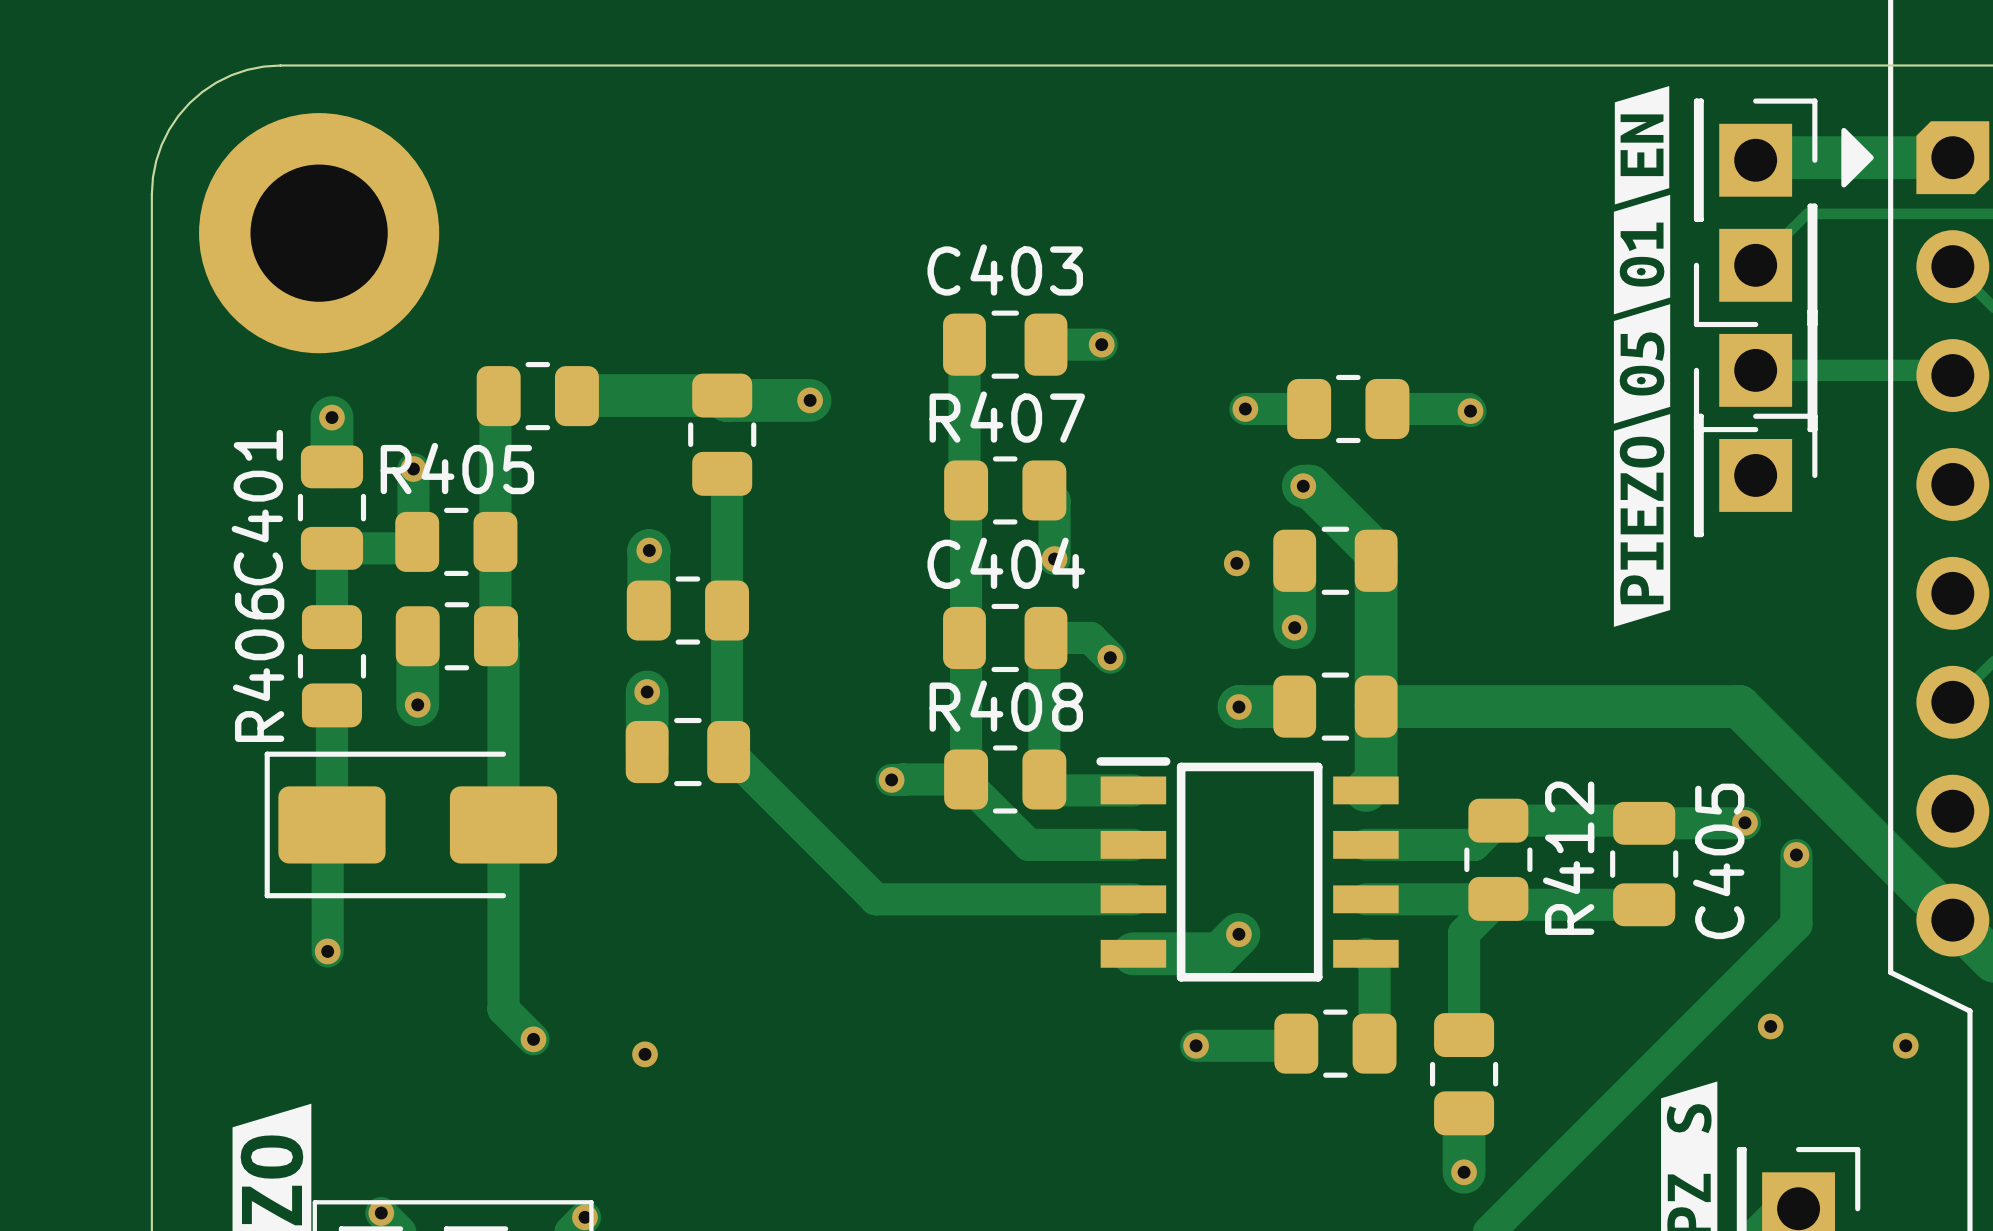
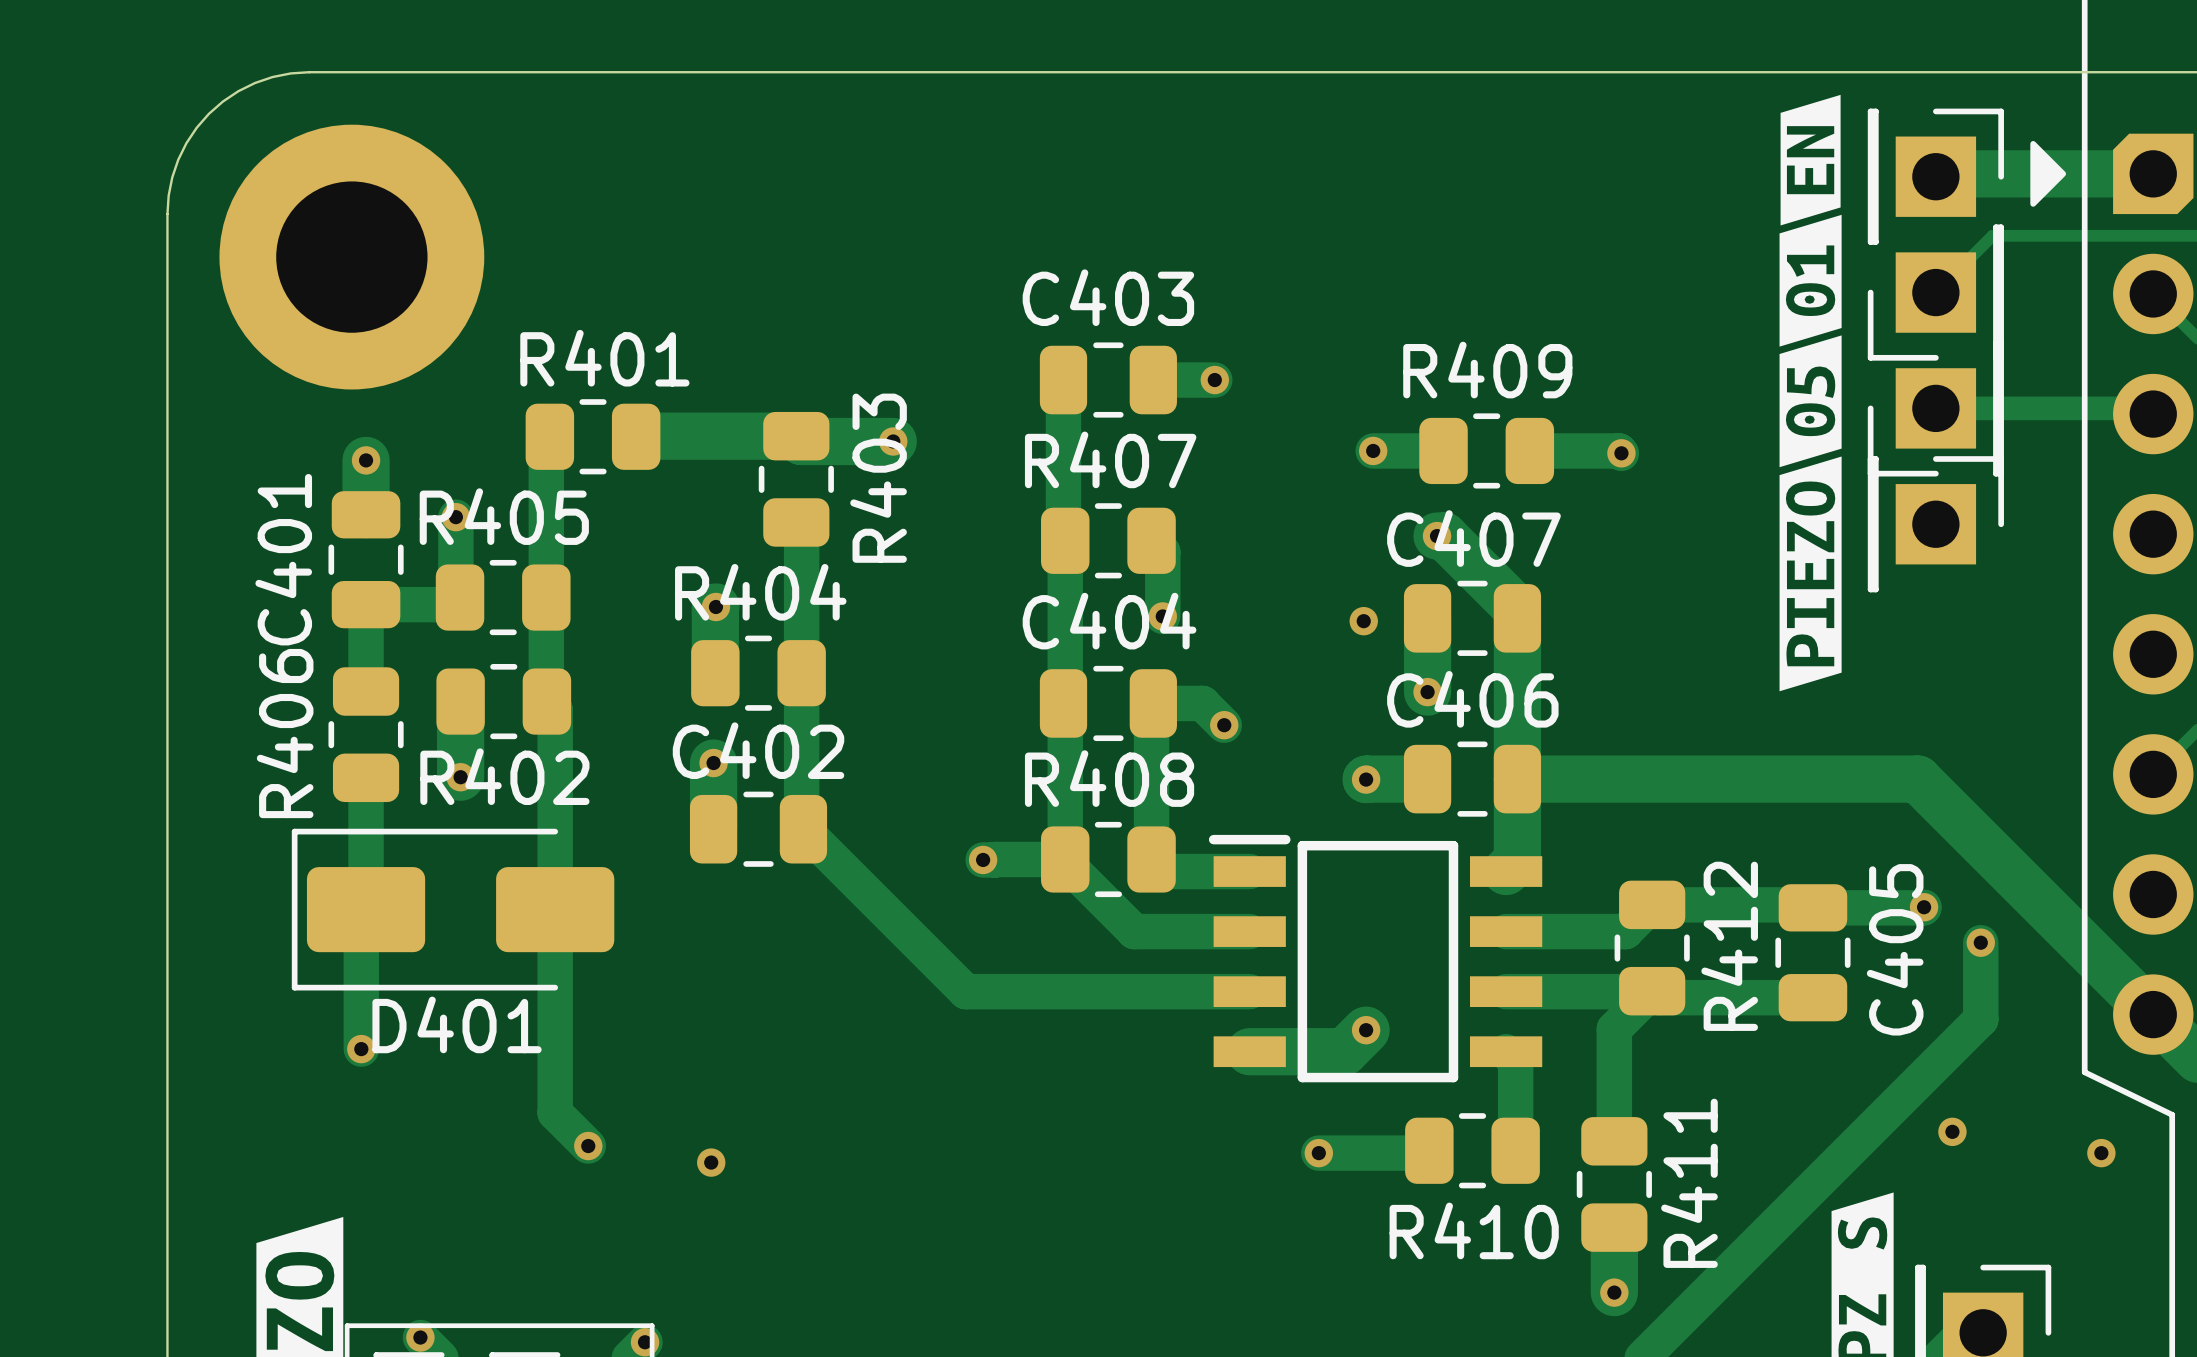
R401 name: none -> R401 (604, 358)
R409 name: none -> R409 (1487, 370)
R403 name: none -> R403 (878, 478)
C407 name: none -> C407 (1473, 538)
R404 name: none -> R404 (760, 592)
C406 name: none -> C406 (1472, 699)
C402 name: none -> C402 (758, 750)
R402 name: none -> R402 (504, 776)
D401 name: none -> D401 (457, 1024)
R411 name: none -> R411 (1689, 1183)
R410 name: none -> R410 (1474, 1230)

